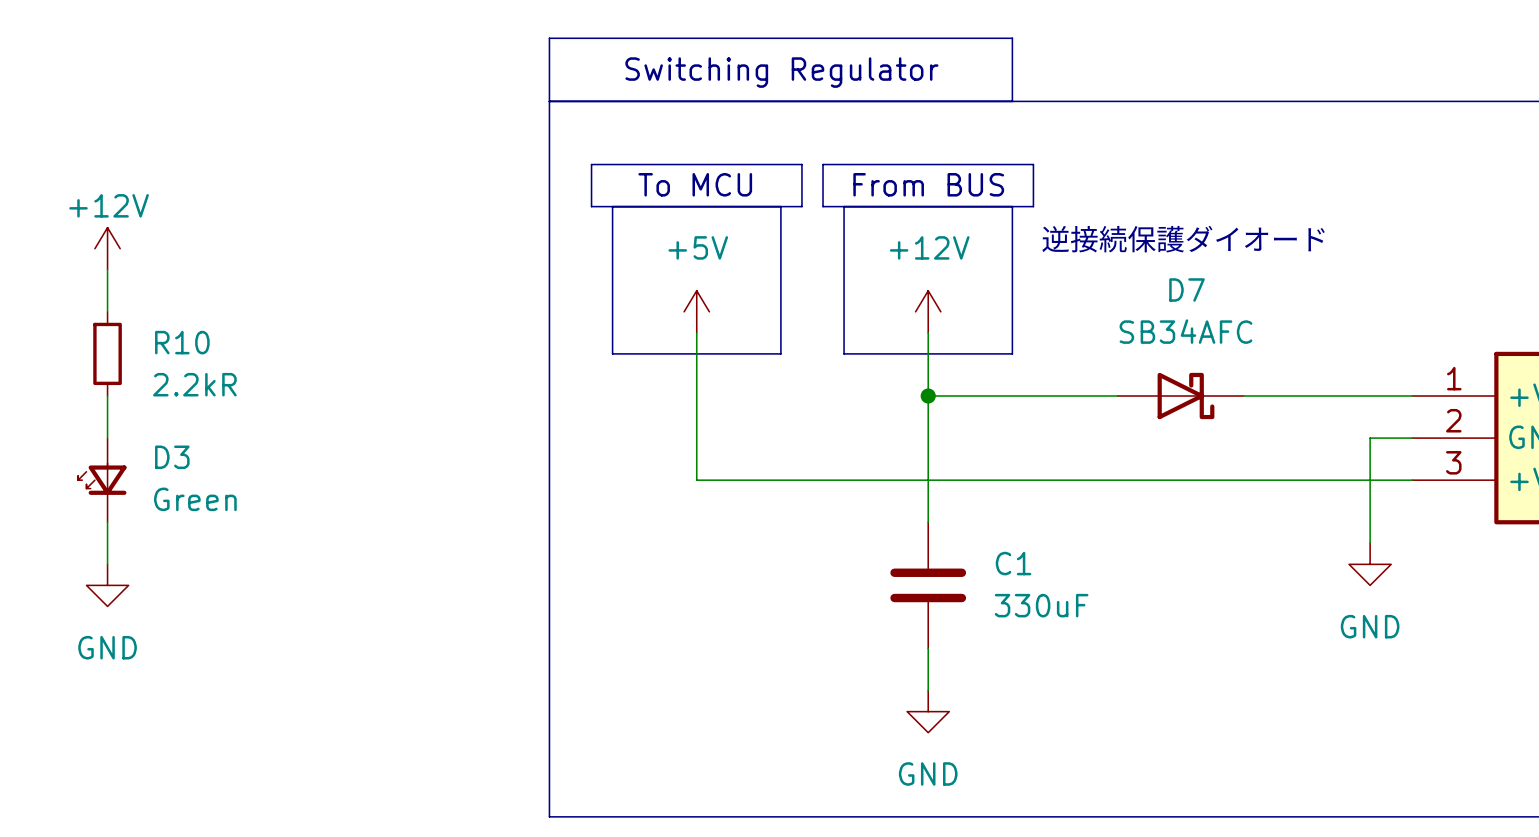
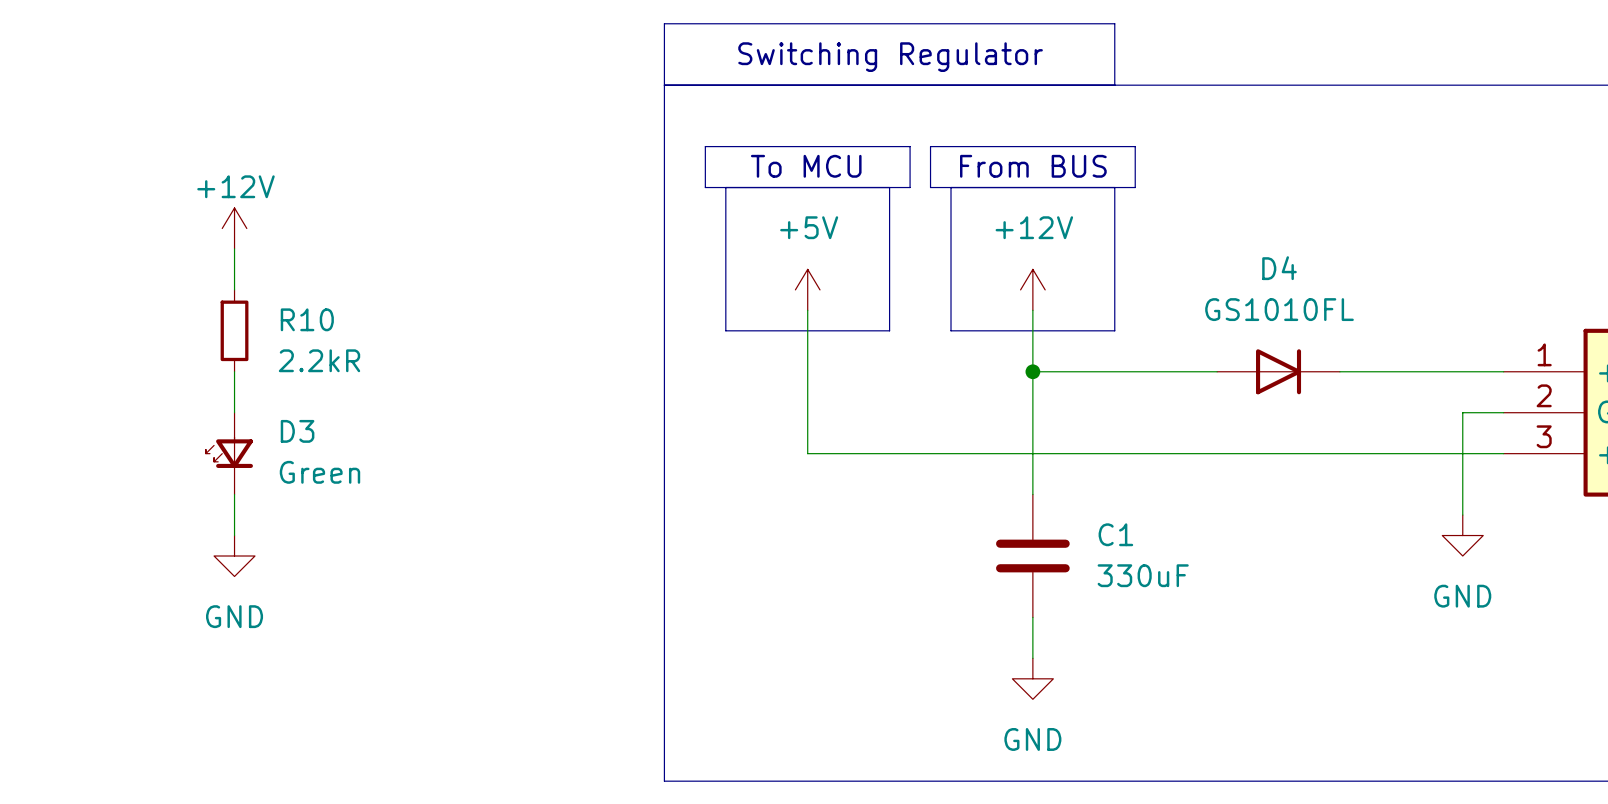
text: 逆接続保護ダイオード (1183, 239) -> none
D7: SB34AFC (1180, 396) -> none
D4: none -> GS1010FL (1278, 371)

